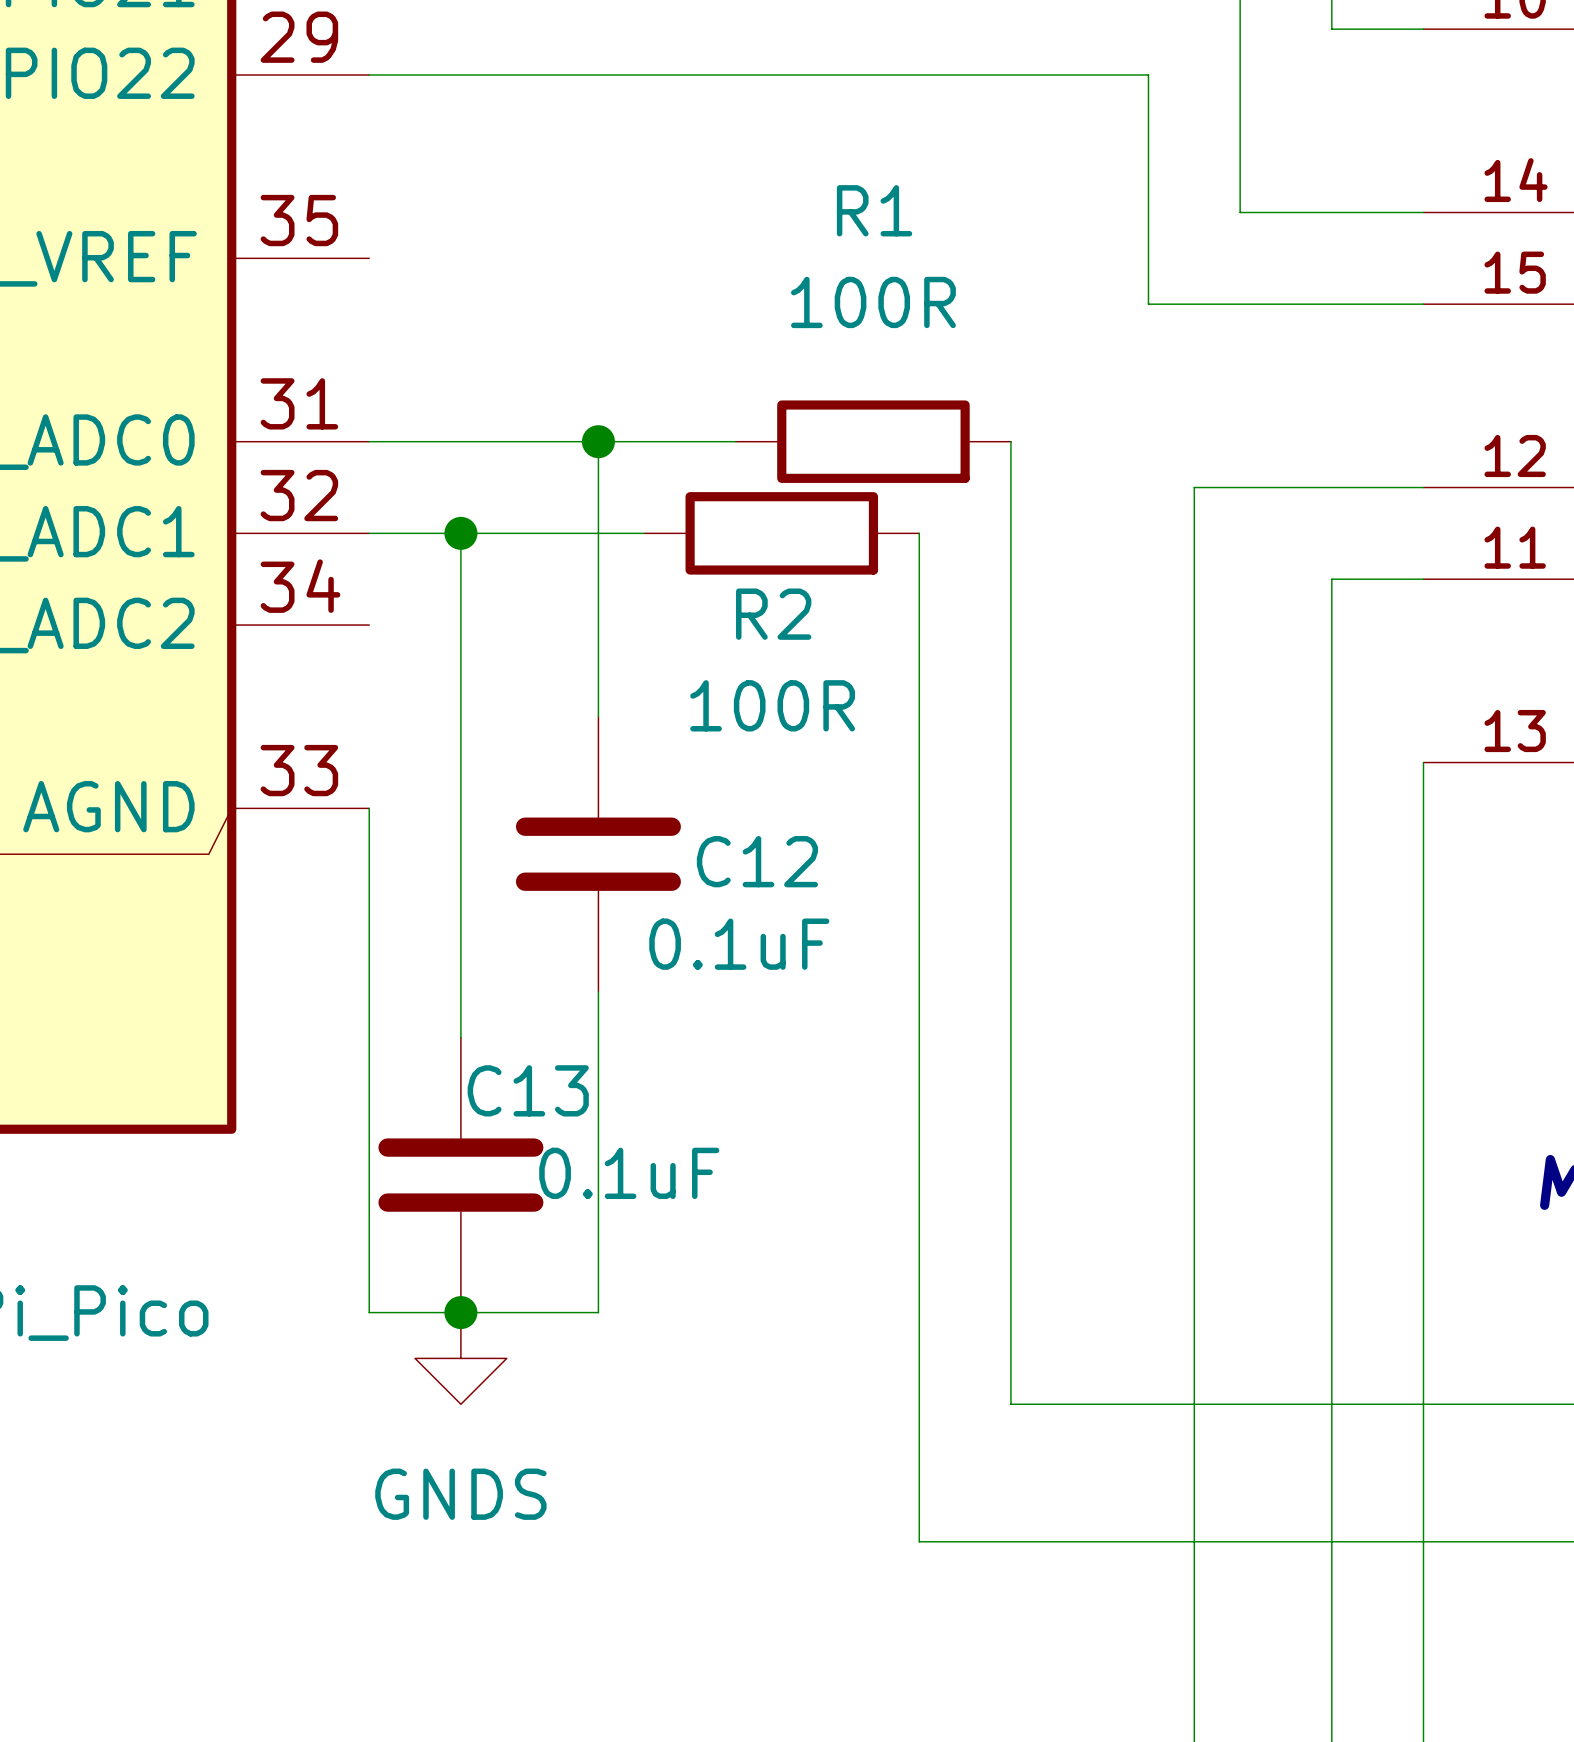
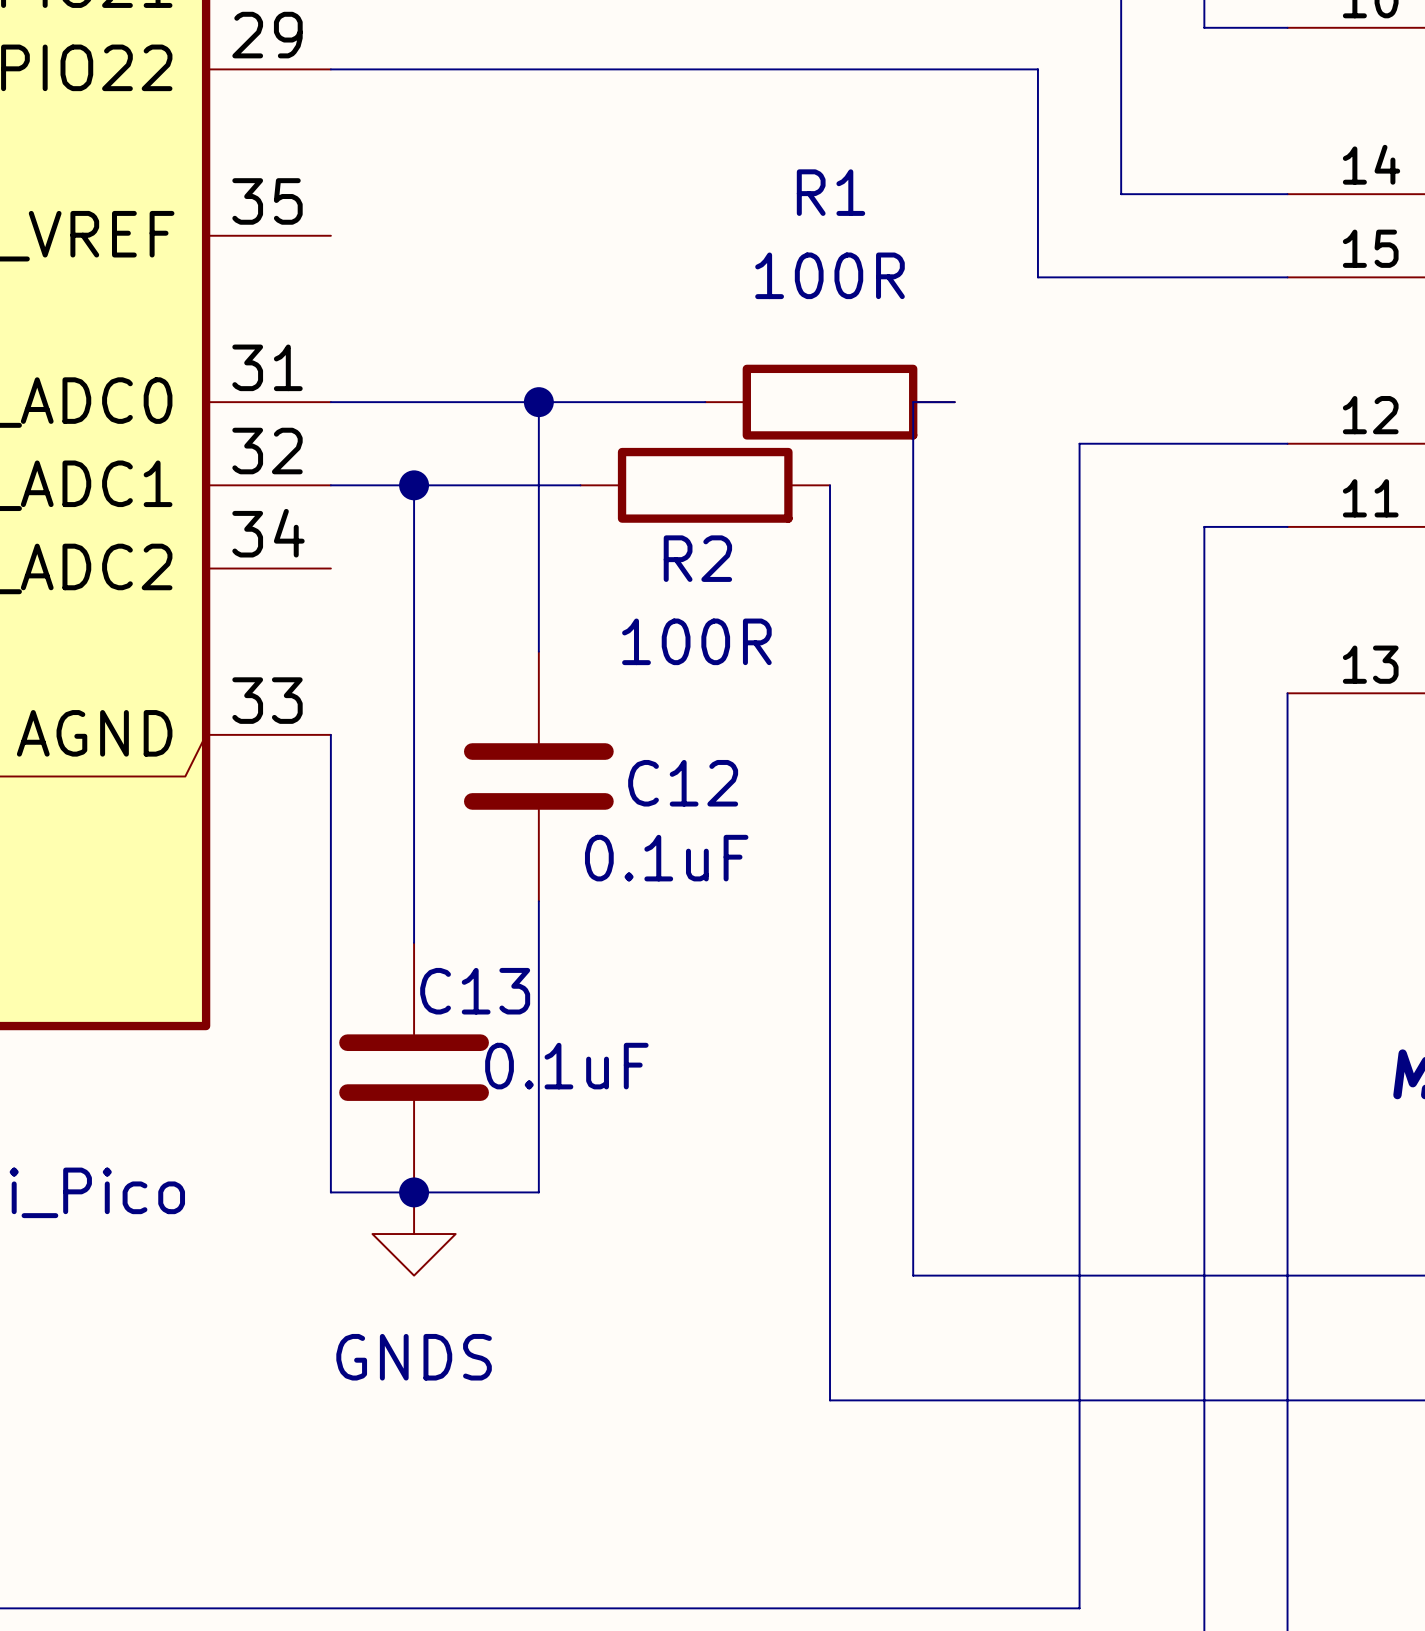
R1 position: (873, 441) -> (830, 402)
wire: none -> (913, 402) (954, 402)

